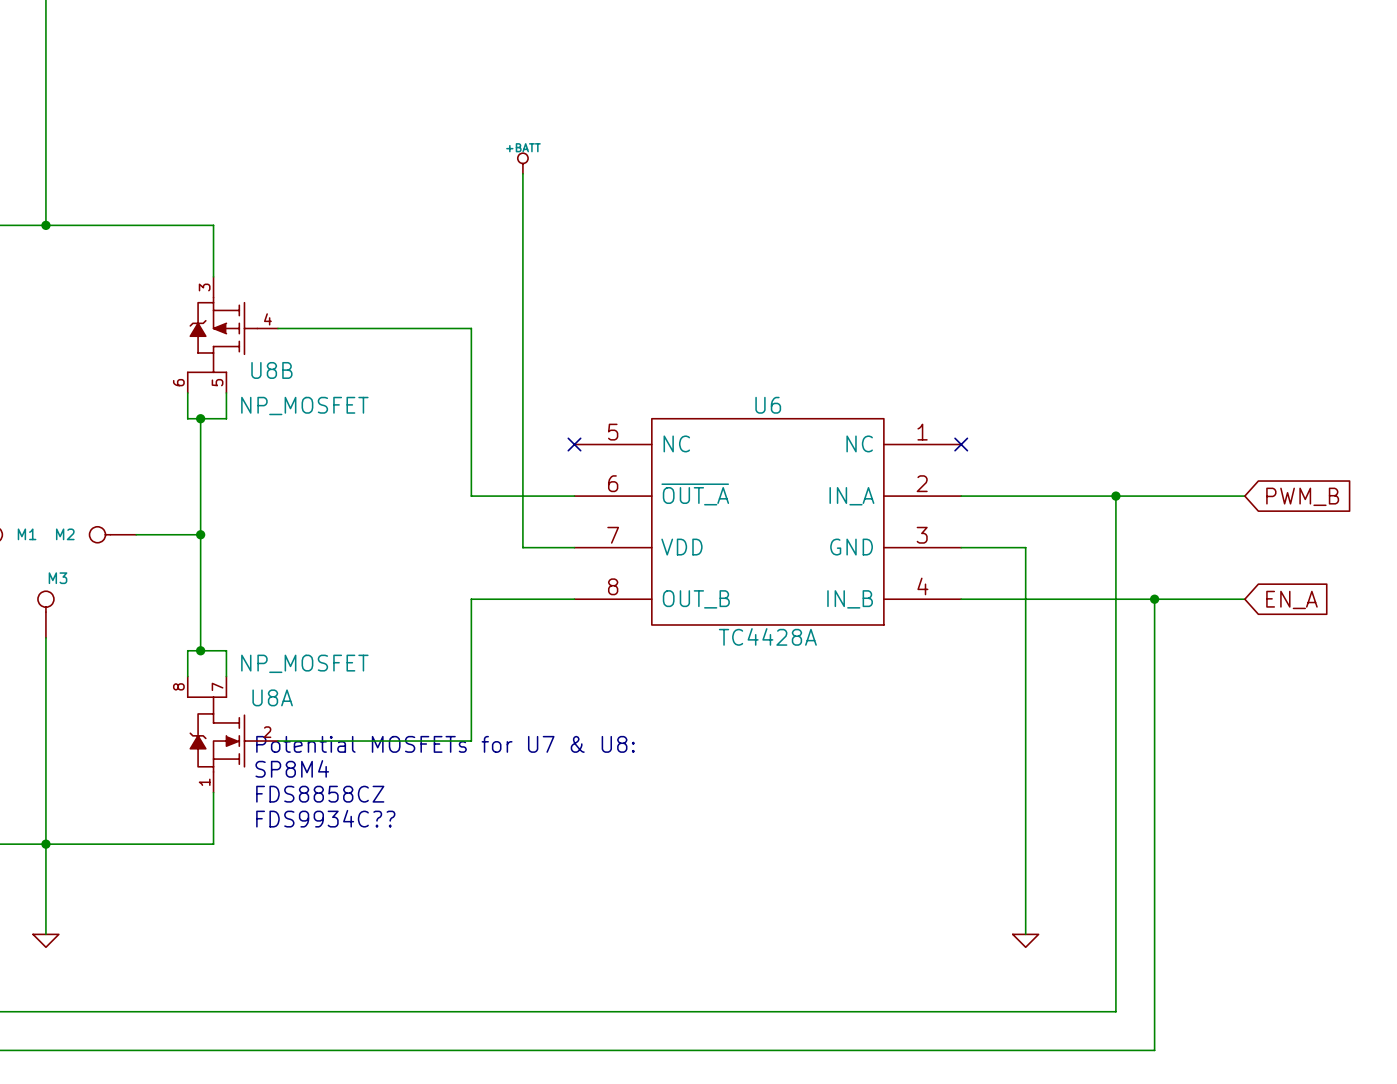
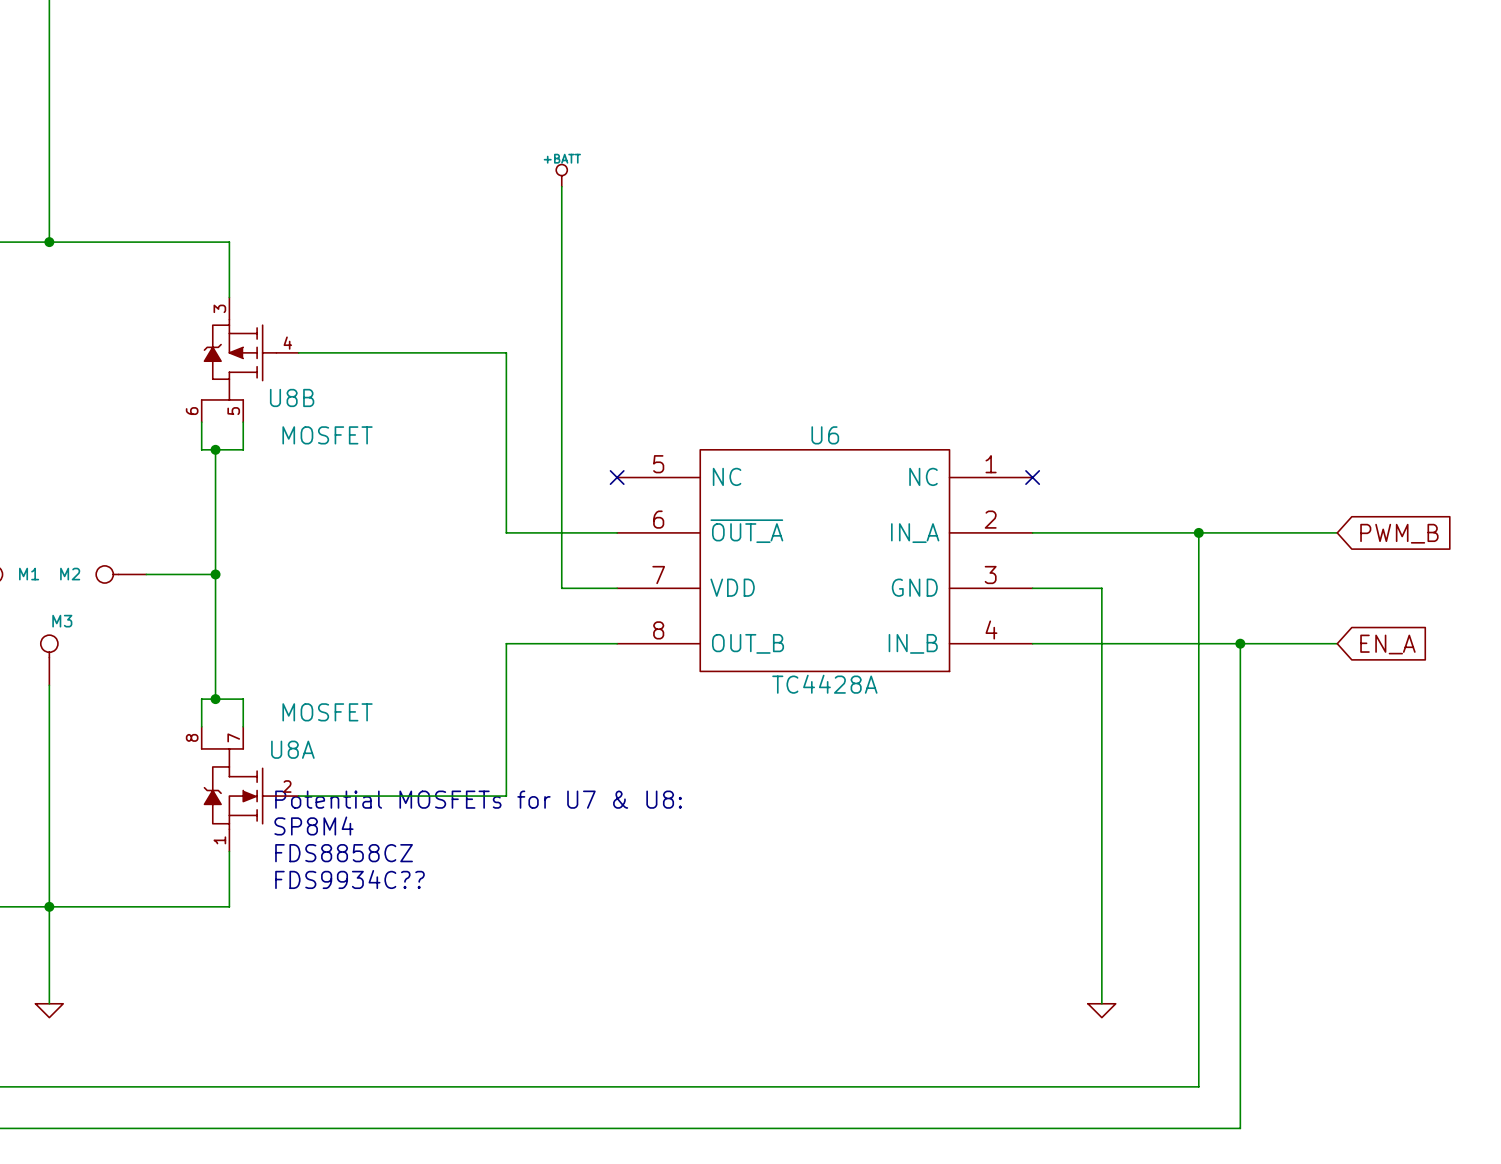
U8B value: NP_MOSFET (304, 406) -> MOSFET (327, 435)
U8A value: NP_MOSFET (304, 663) -> MOSFET (327, 712)

